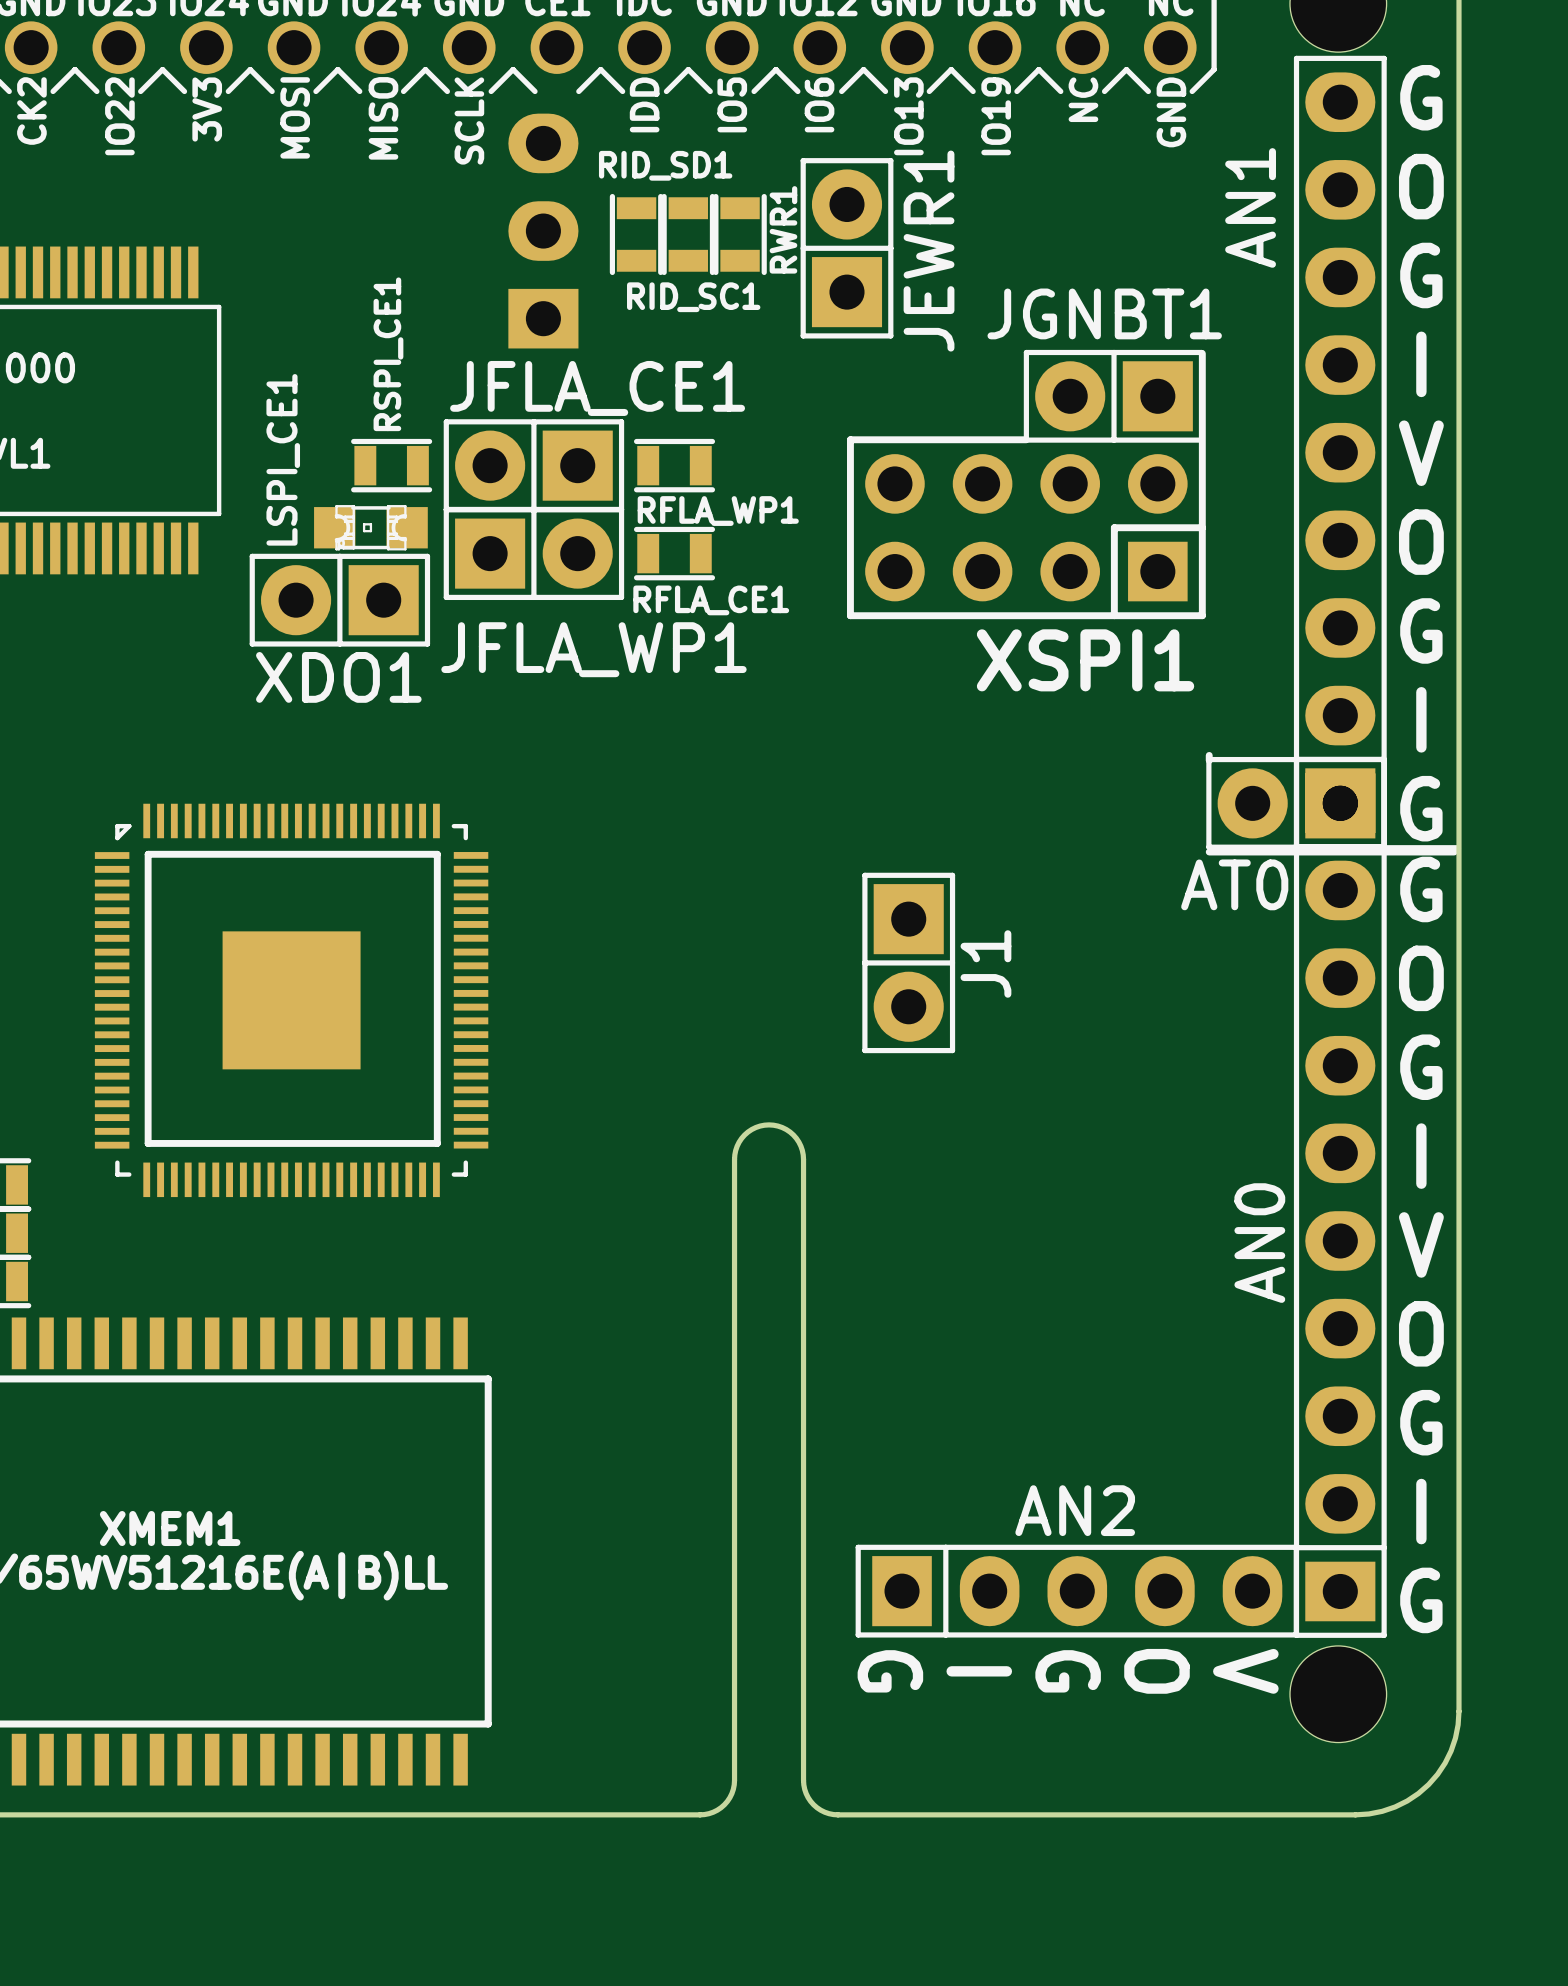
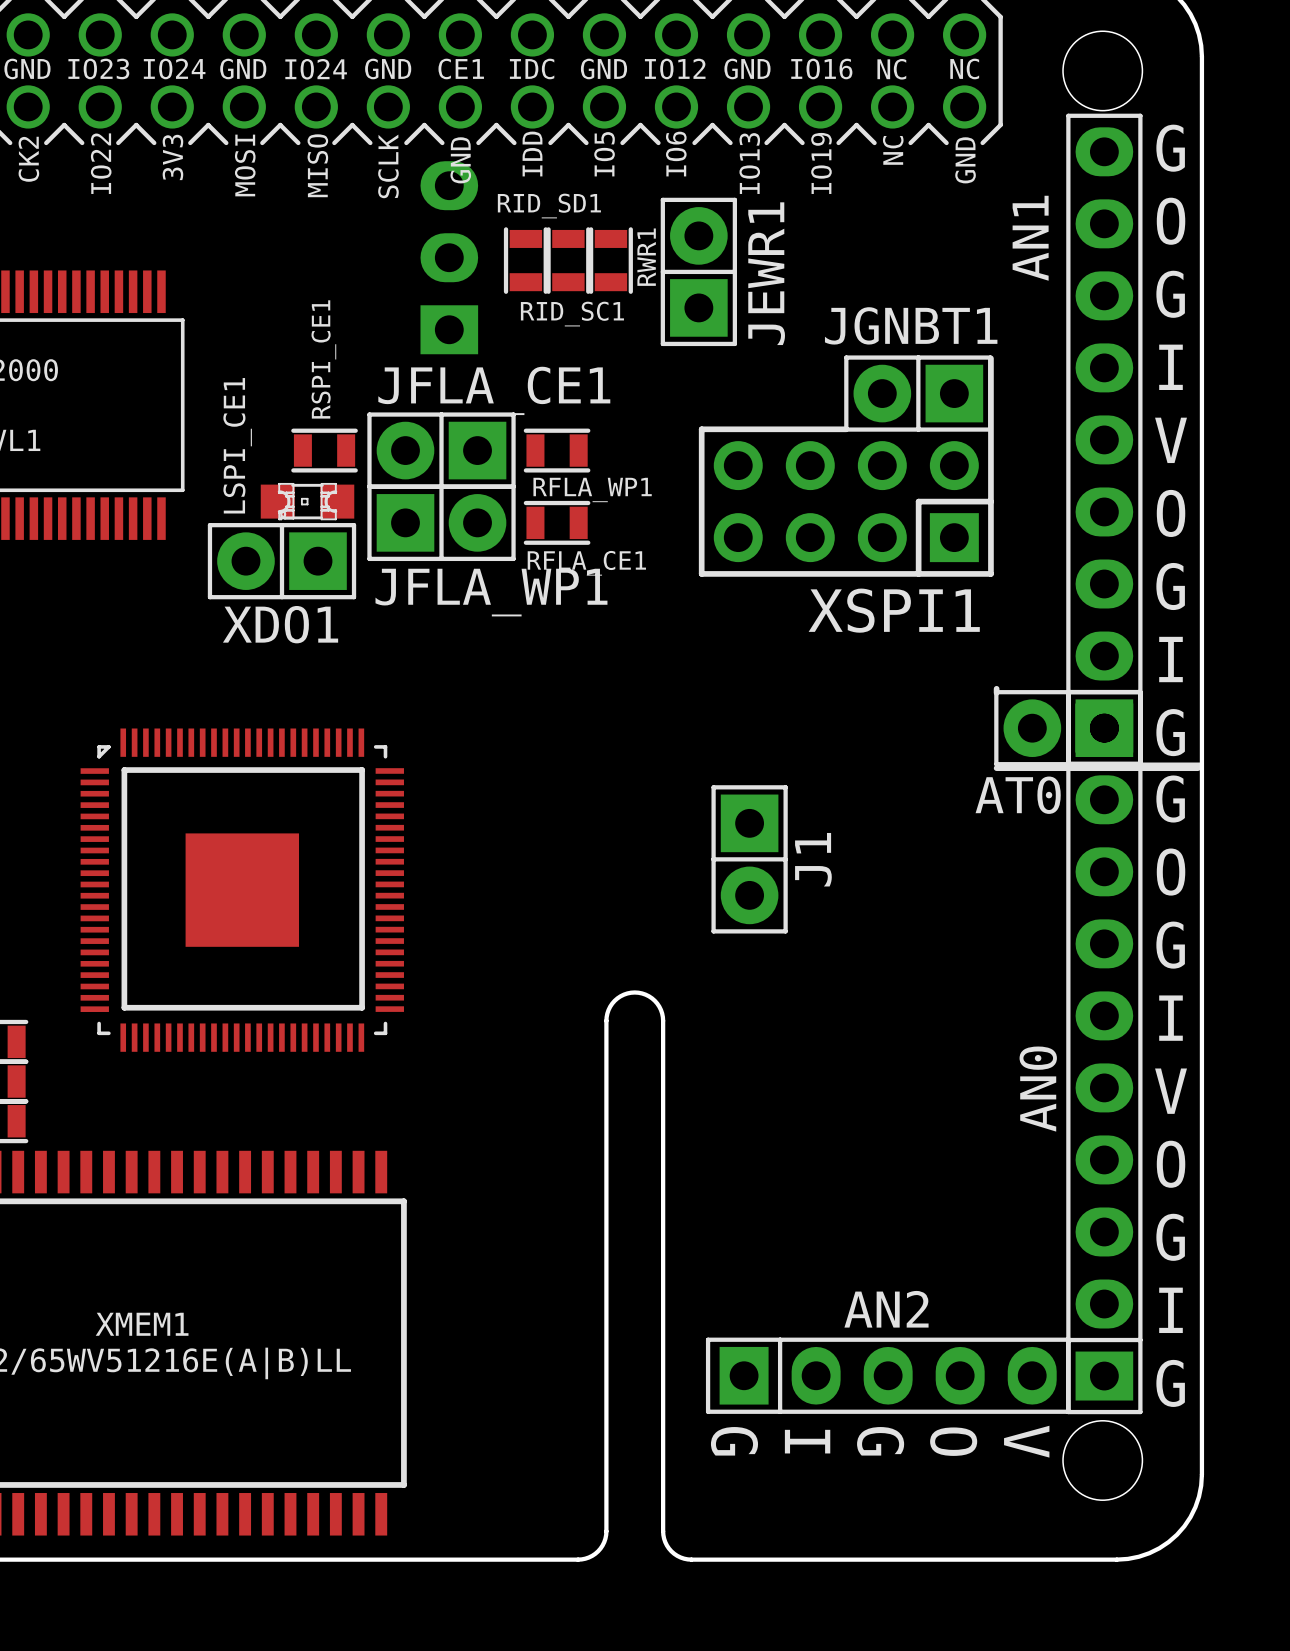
text: none -> GND (460, 160)
JFLA_WP1 name position: JFLA_WP1 (593, 649) -> JFLA_WP1 (491, 592)

